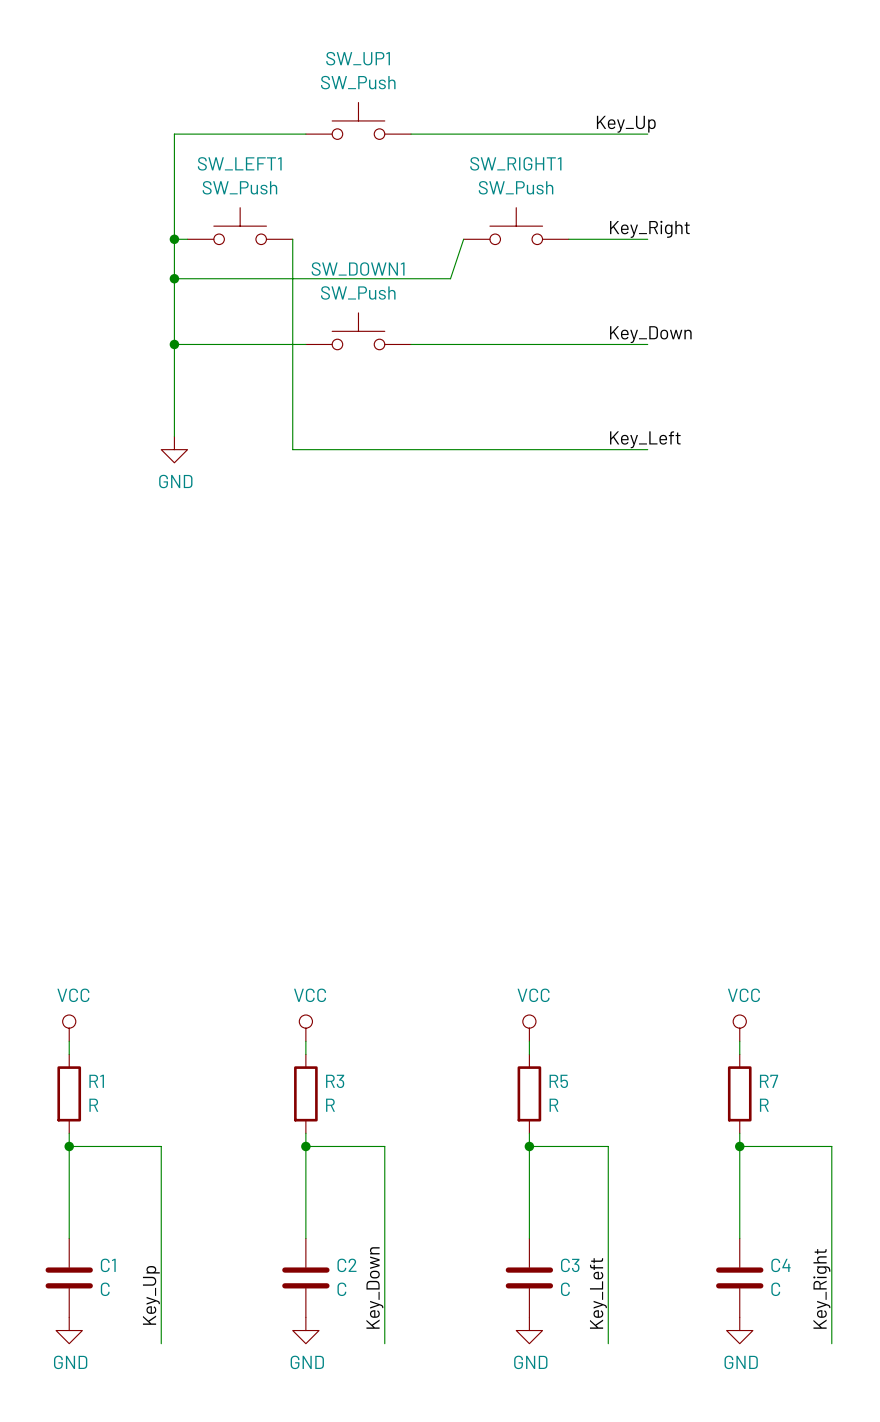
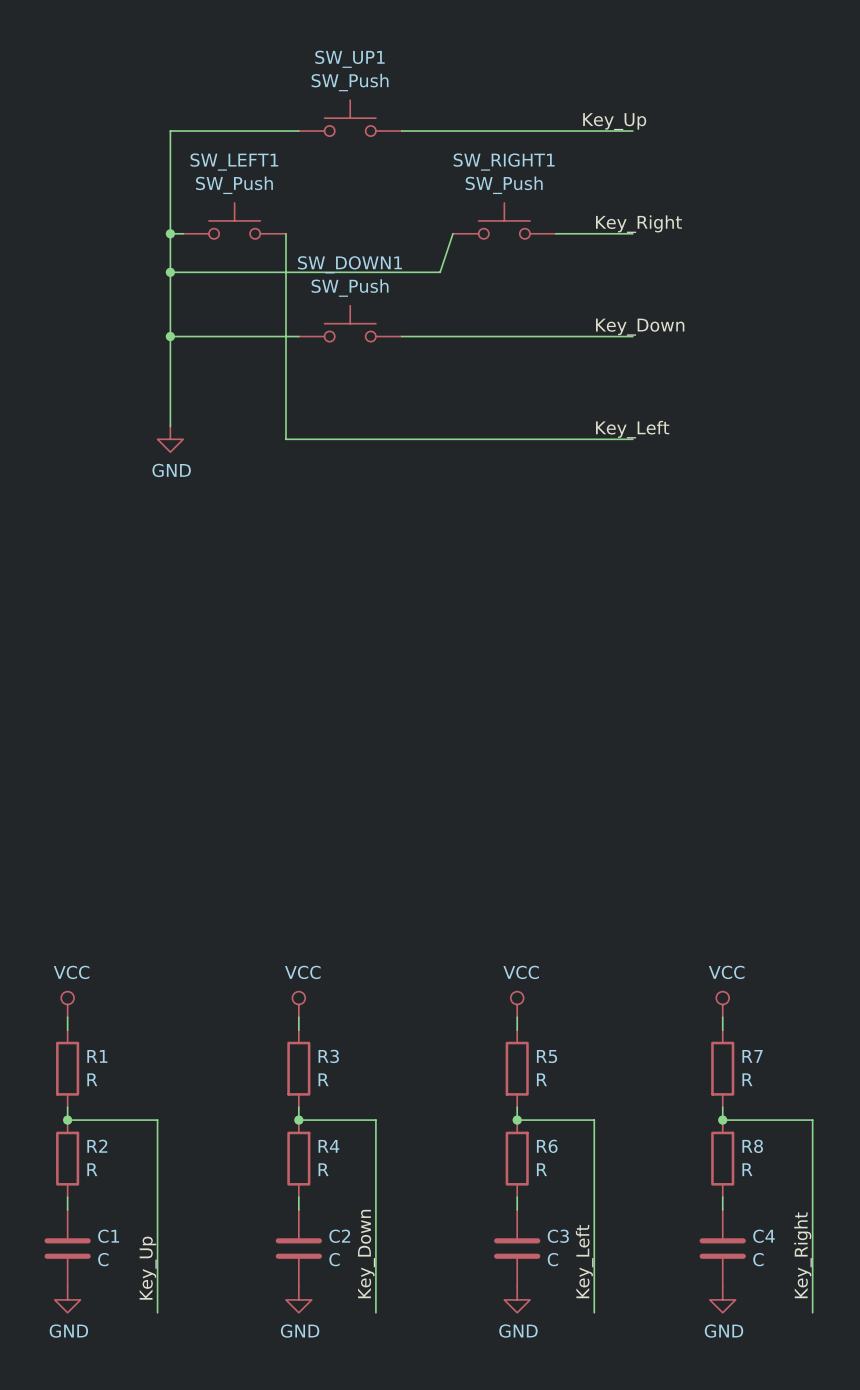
wire: (69, 1146) (69, 1225) -> none
wire: (305, 1146) (305, 1225) -> none
wire: (529, 1146) (529, 1225) -> none
wire: (739, 1146) (739, 1225) -> none
R2: none -> R (67, 1158)
R4: none -> R (298, 1158)
R6: none -> R (517, 1158)
R8: none -> R (722, 1158)

